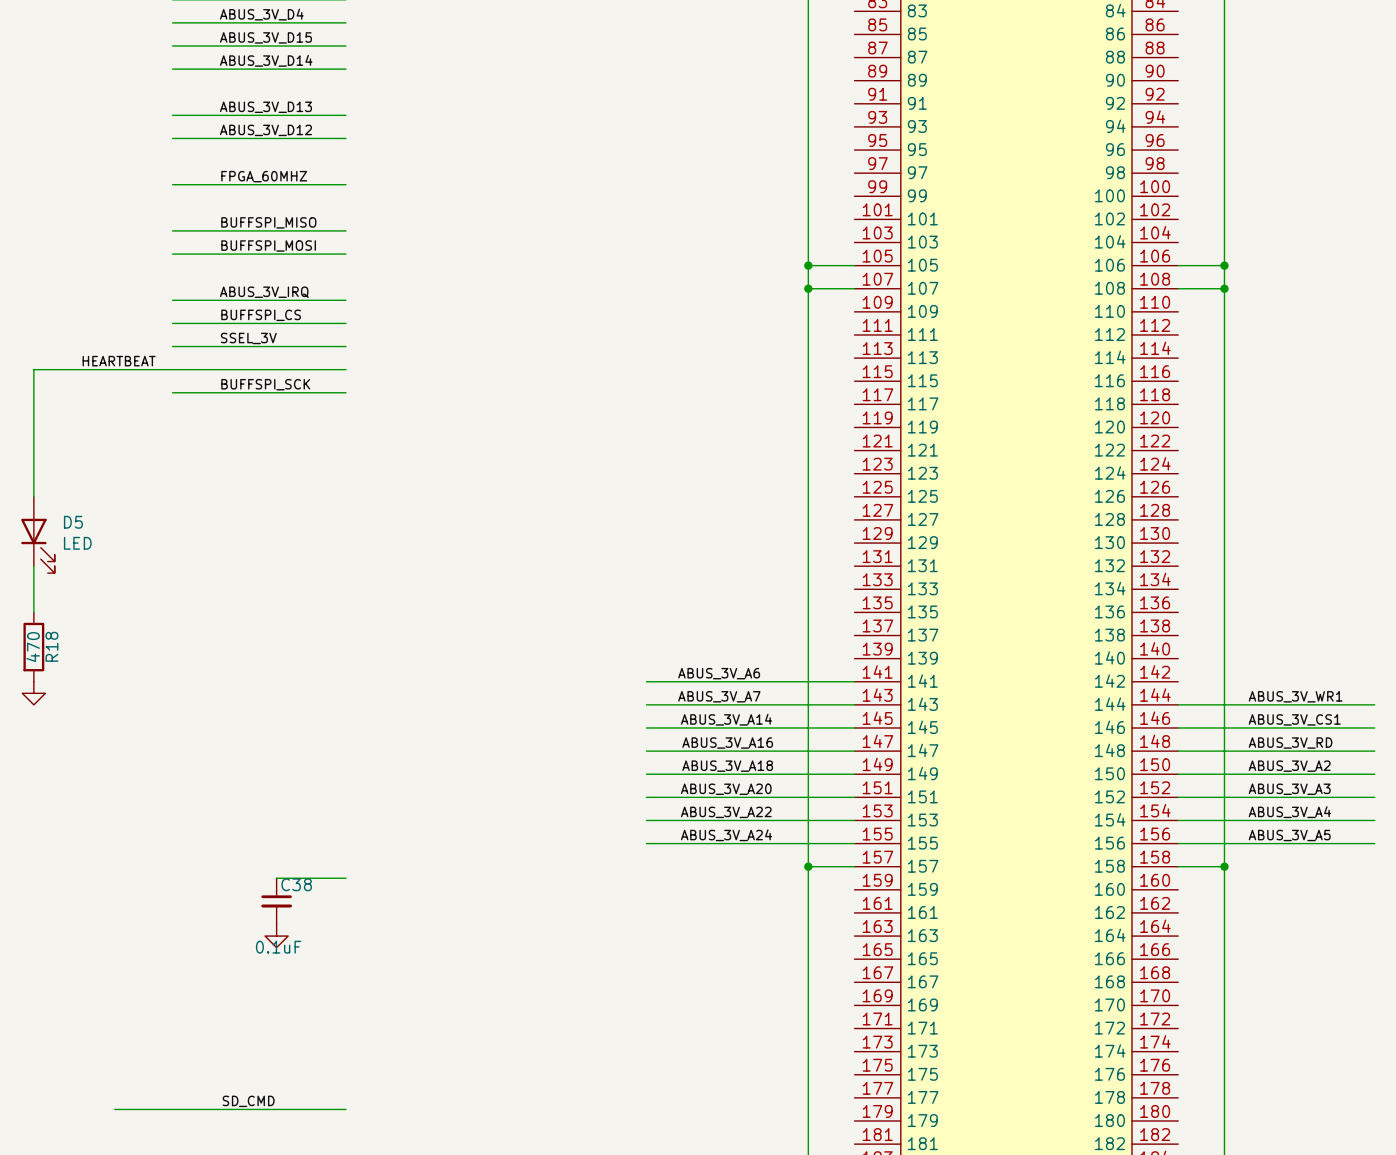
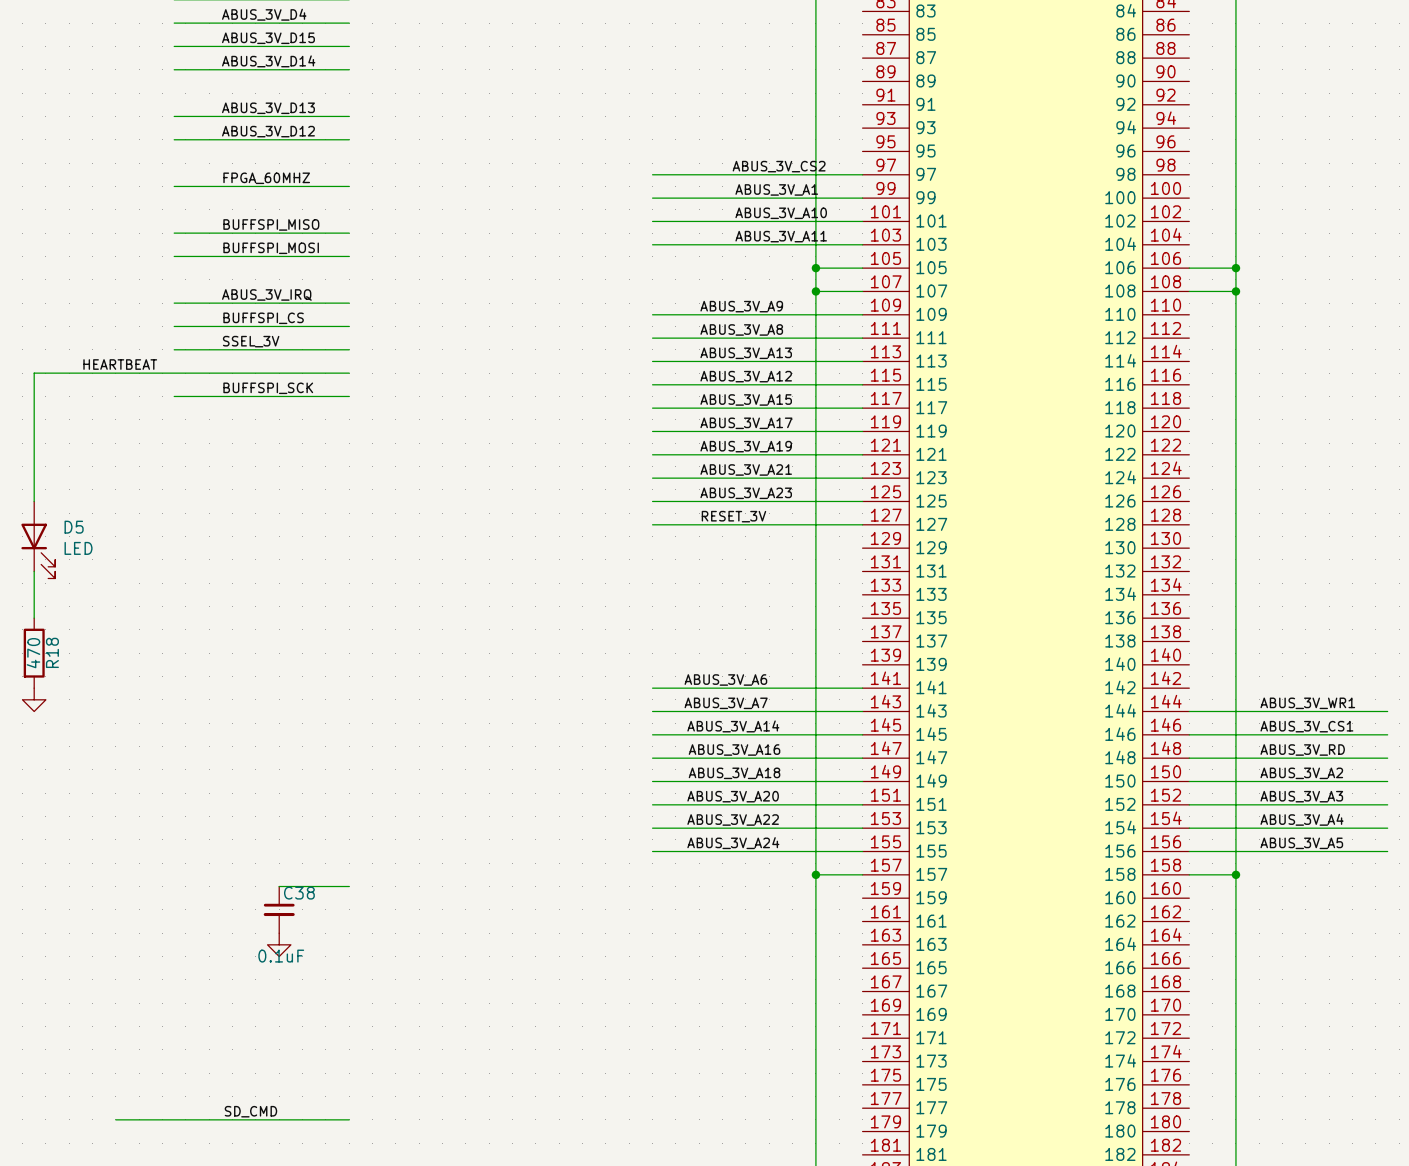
label: none -> ABUS_3V_CS2 (779, 166)
wire: none -> (652, 174) (862, 174)
label: none -> ABUS_3V_A1 (776, 189)
wire: none -> (652, 198) (862, 198)
label: none -> ABUS_3V_A10 (781, 213)
wire: none -> (652, 221) (862, 221)
label: none -> ABUS_3V_A11 (781, 236)
wire: none -> (652, 244) (862, 244)
label: none -> ABUS_3V_A9 (741, 306)
wire: none -> (652, 314) (862, 314)
label: none -> ABUS_3V_A8 (741, 329)
wire: none -> (652, 338) (862, 338)
label: none -> ABUS_3V_A13 (746, 353)
wire: none -> (652, 361) (862, 361)
label: none -> ABUS_3V_A12 (746, 376)
wire: none -> (652, 384) (862, 384)
label: none -> ABUS_3V_A15 (746, 399)
wire: none -> (652, 408) (862, 408)
label: none -> ABUS_3V_A17 (746, 423)
wire: none -> (652, 431) (862, 431)
label: none -> ABUS_3V_A19 (746, 446)
wire: none -> (652, 454) (862, 454)
label: none -> ABUS_3V_A21 (746, 469)
wire: none -> (652, 478) (862, 478)
label: none -> ABUS_3V_A23 (746, 493)
wire: none -> (652, 501) (862, 501)
label: none -> RESET_3V (733, 516)
wire: none -> (652, 524) (862, 524)

